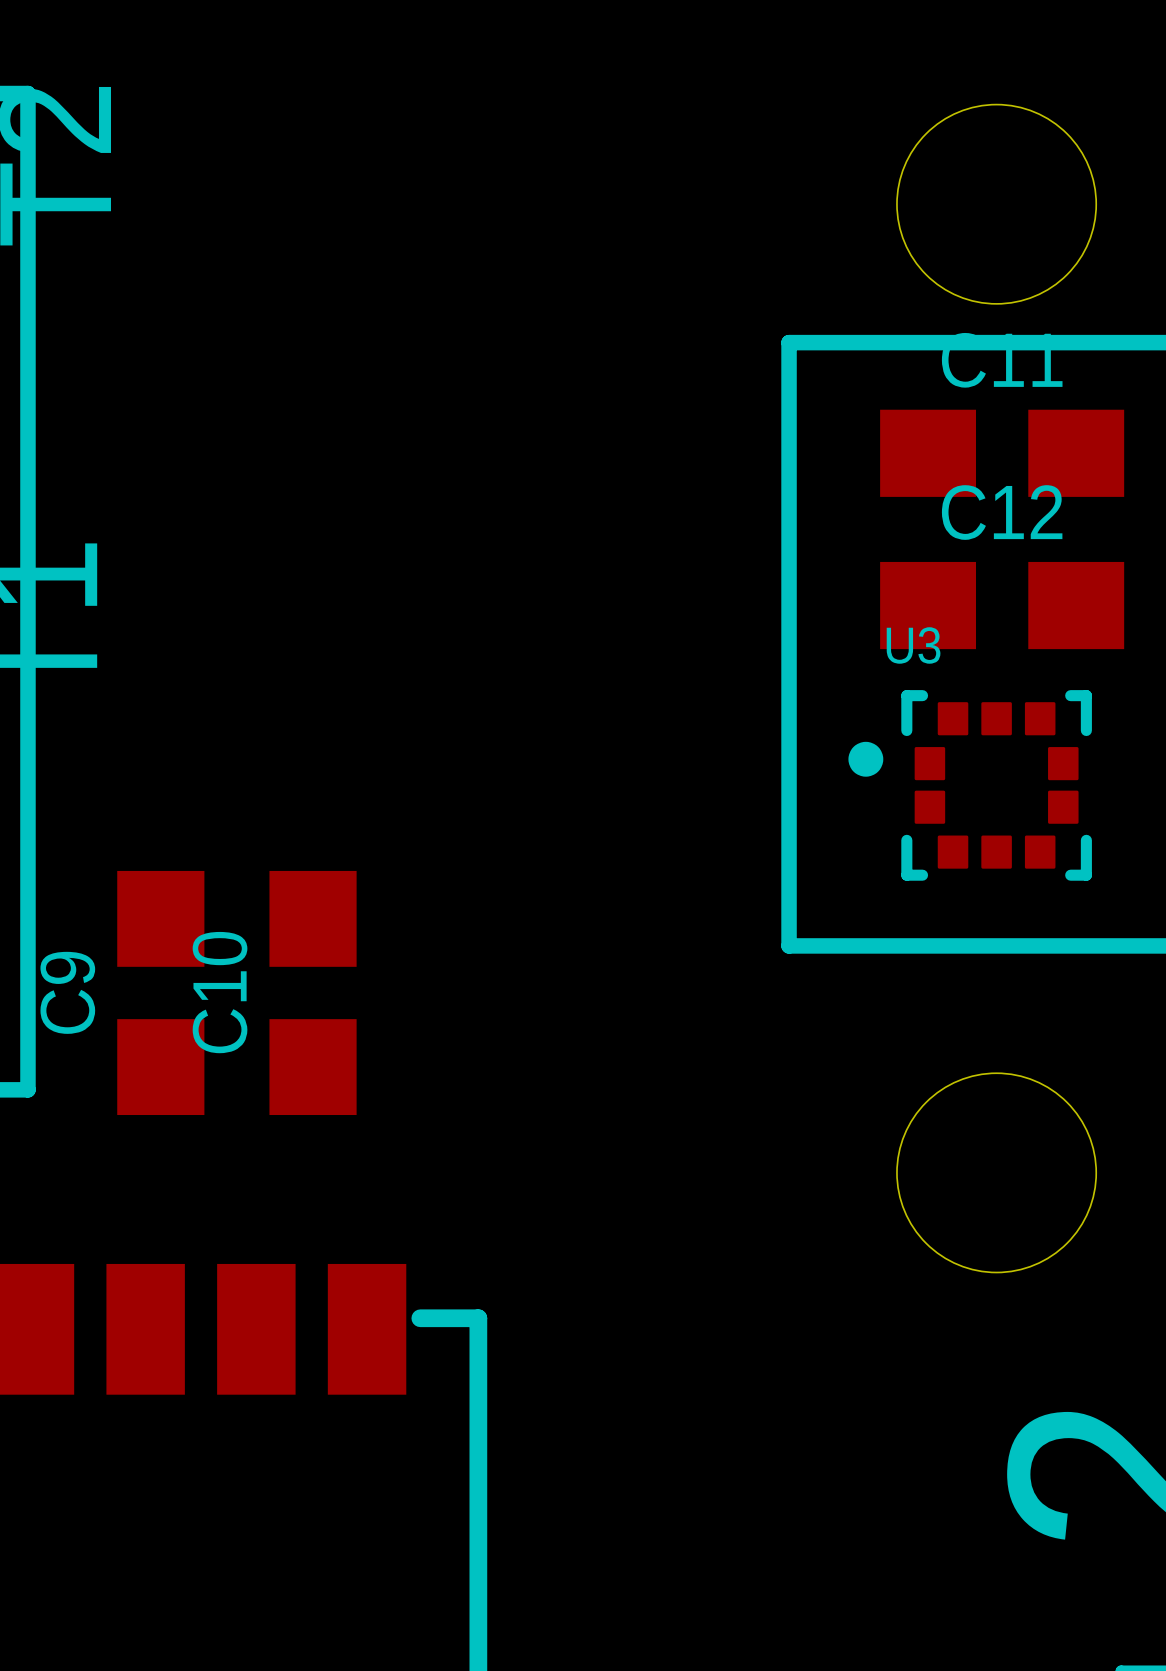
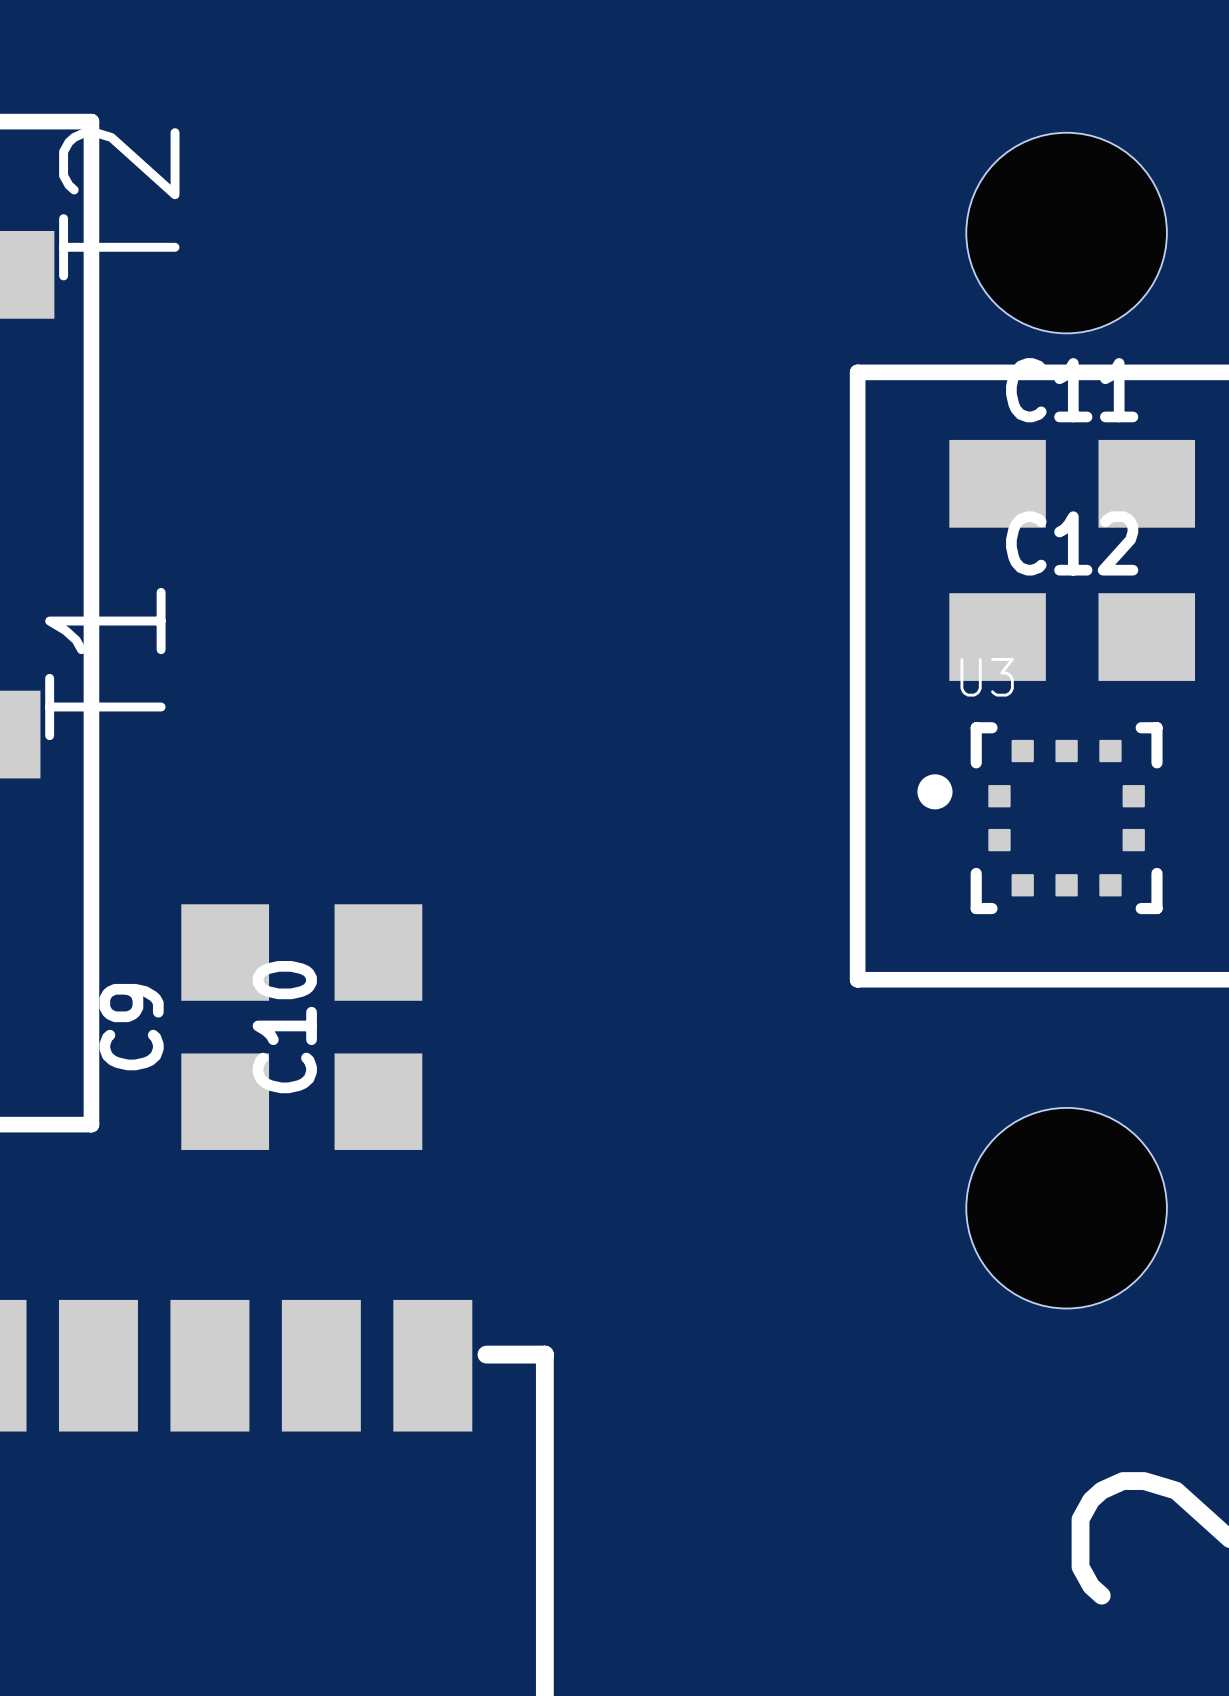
U3 footprint: [848, 690, 1092, 881] -> [917, 722, 1163, 915]

